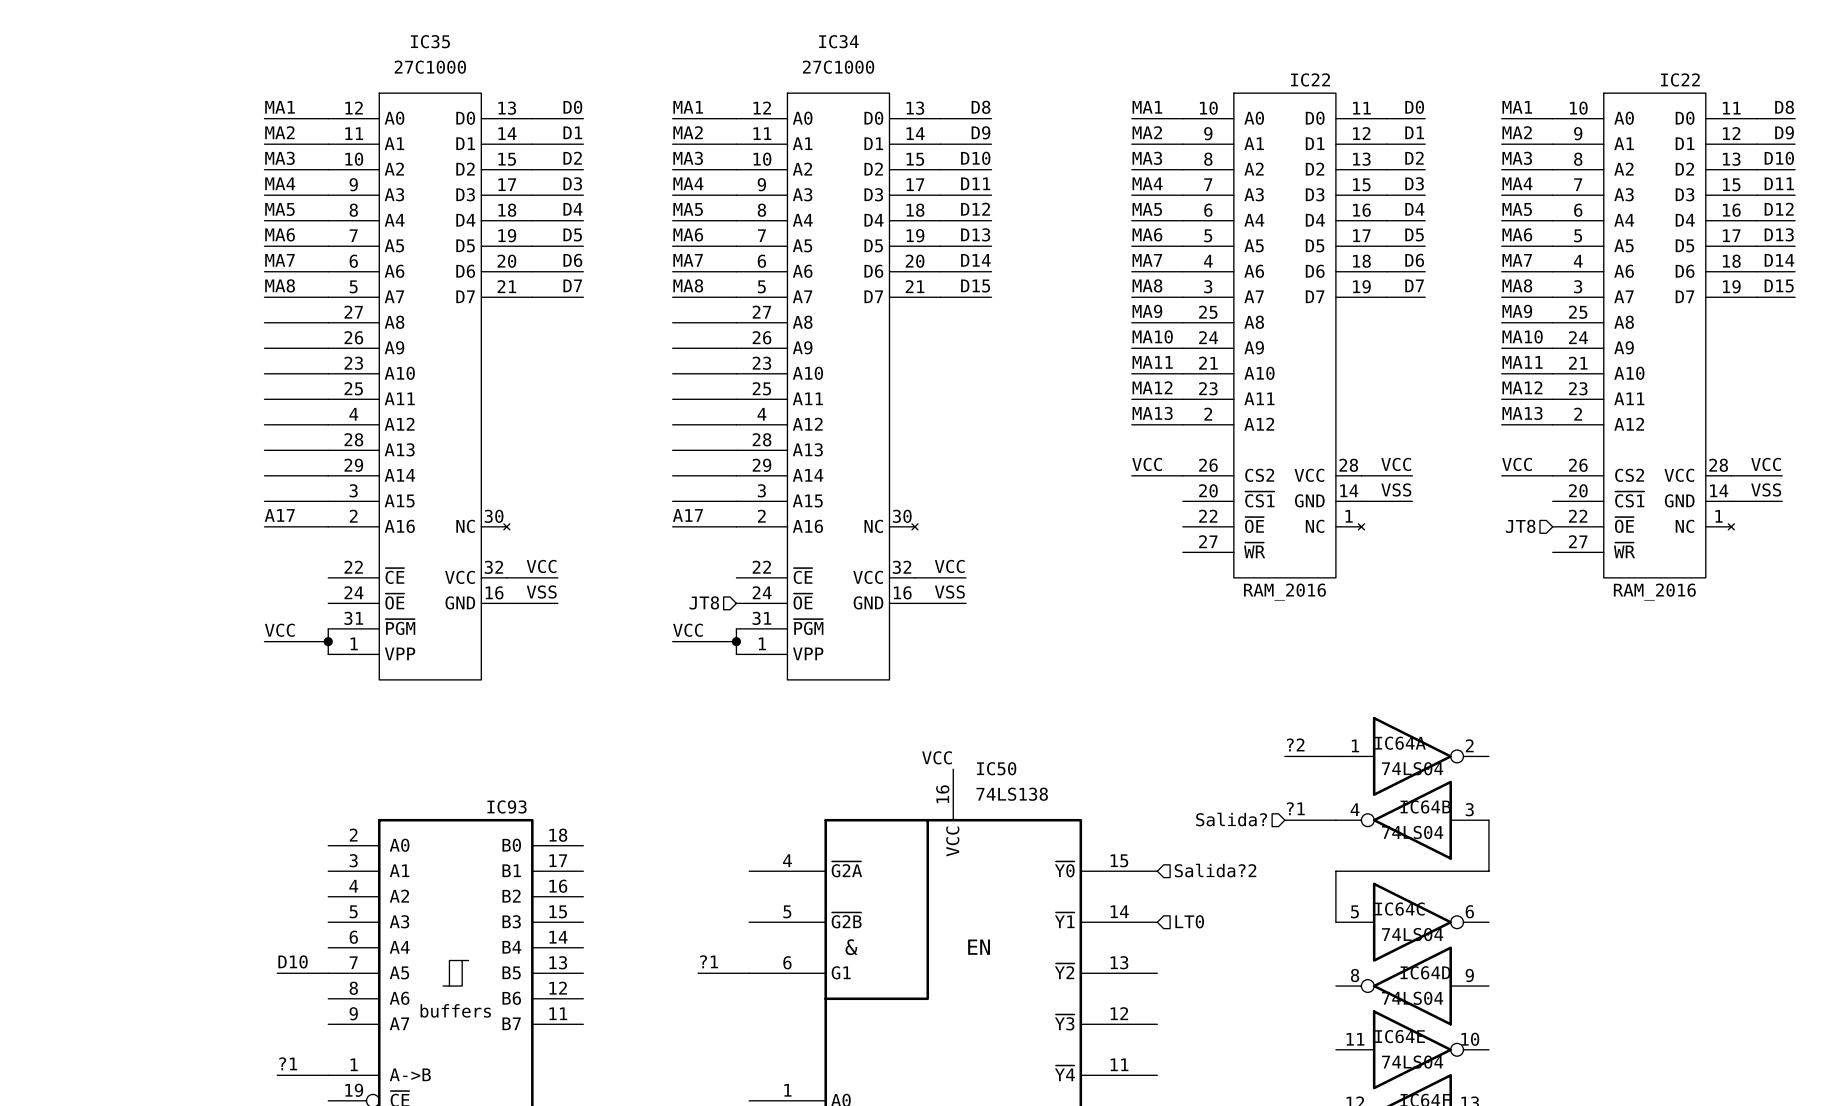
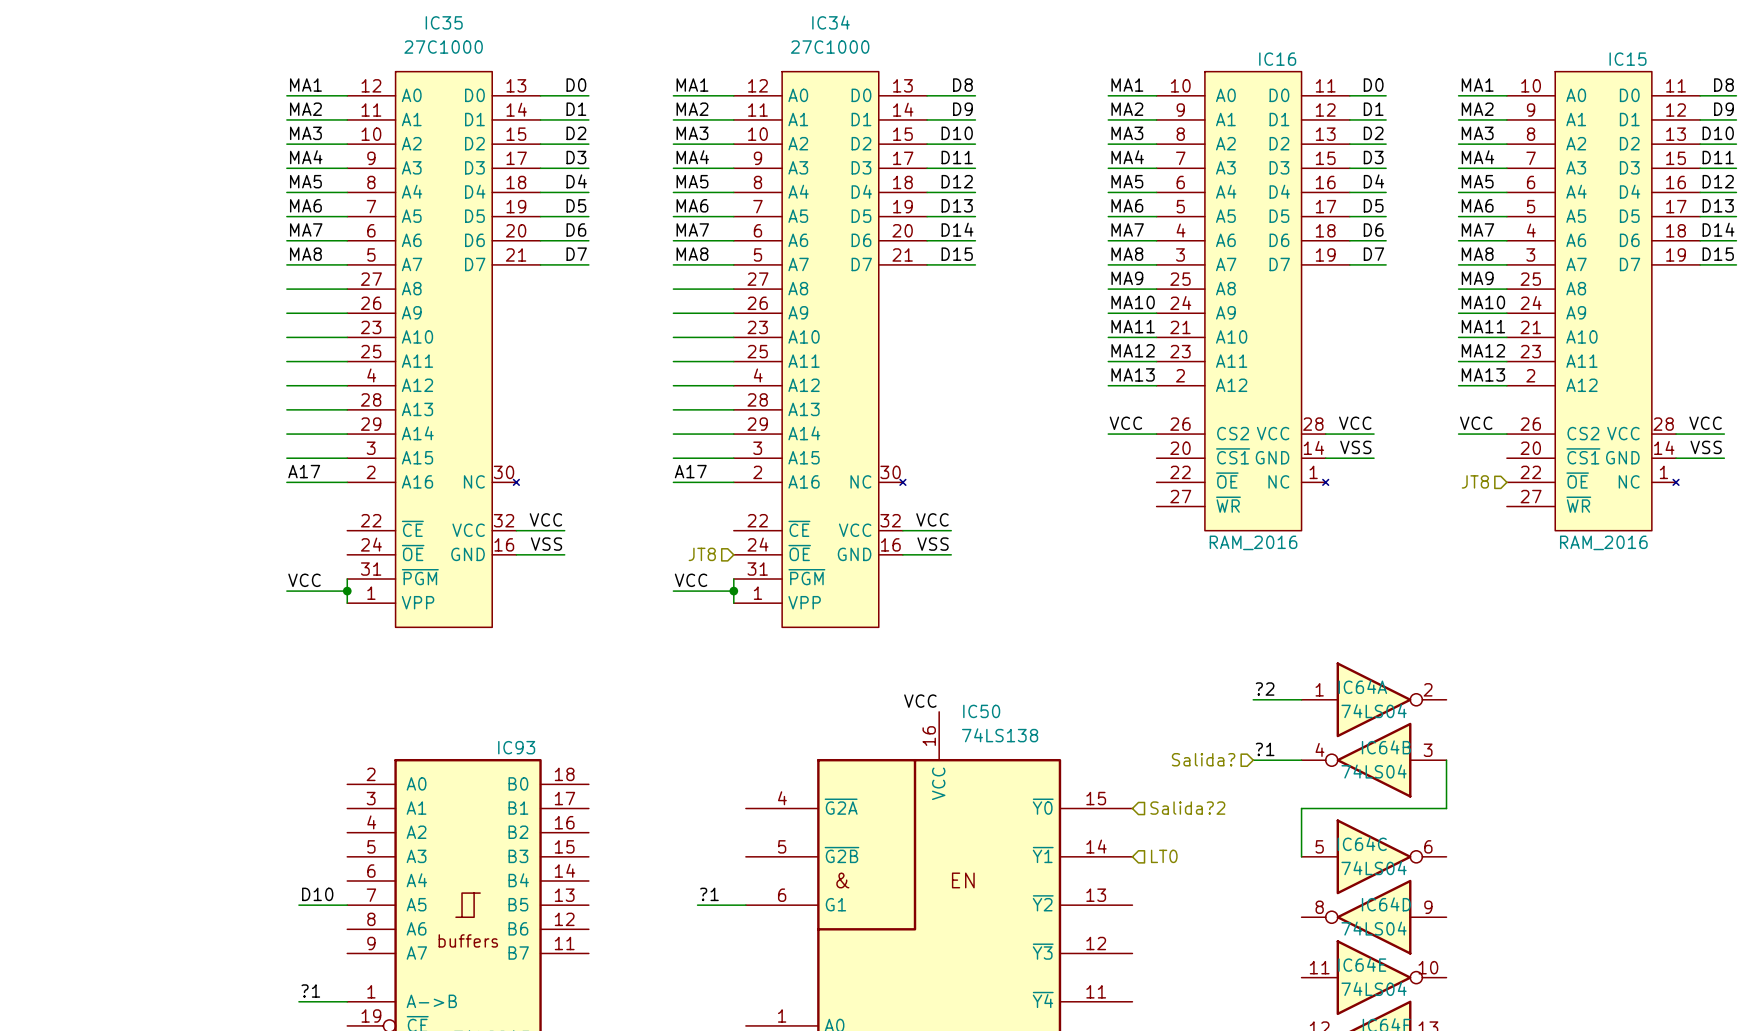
IC22 name: IC22 (1310, 79) -> IC16 (1277, 59)
IC22 name: IC22 (1680, 79) -> IC15 (1627, 59)

